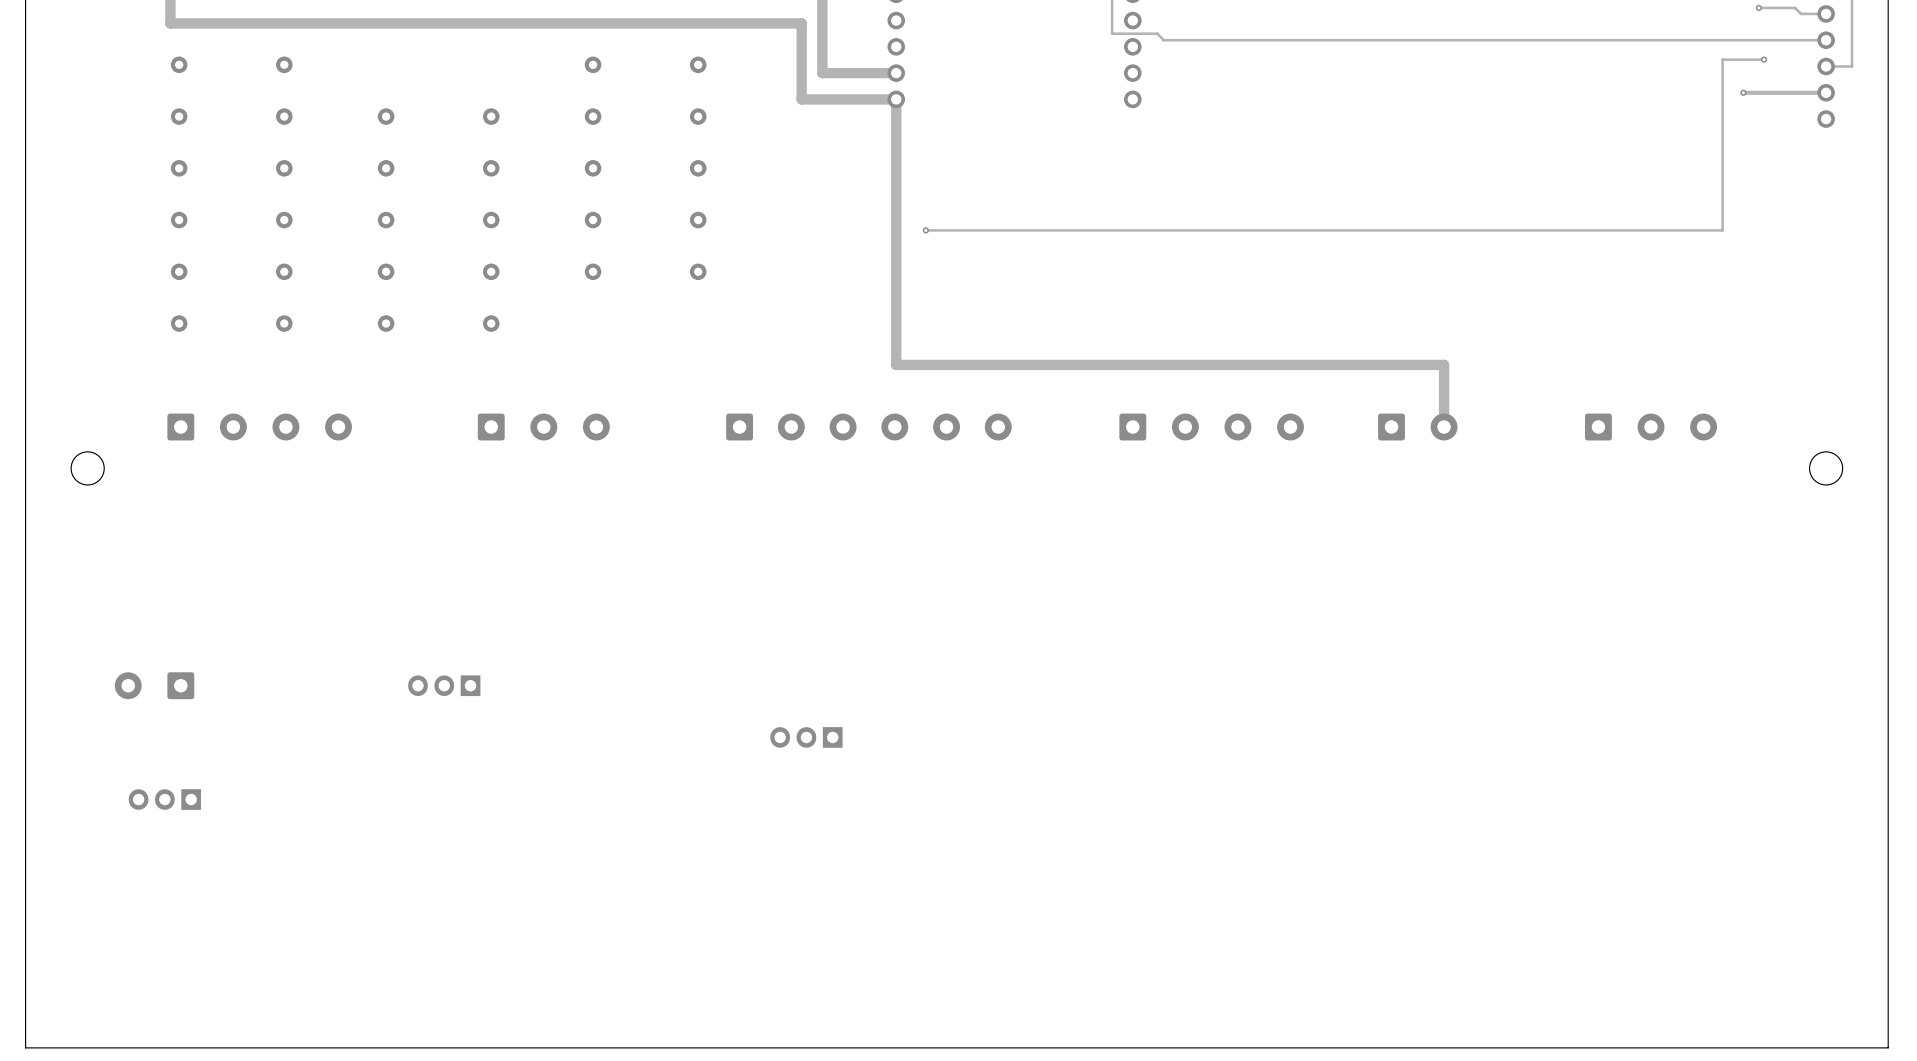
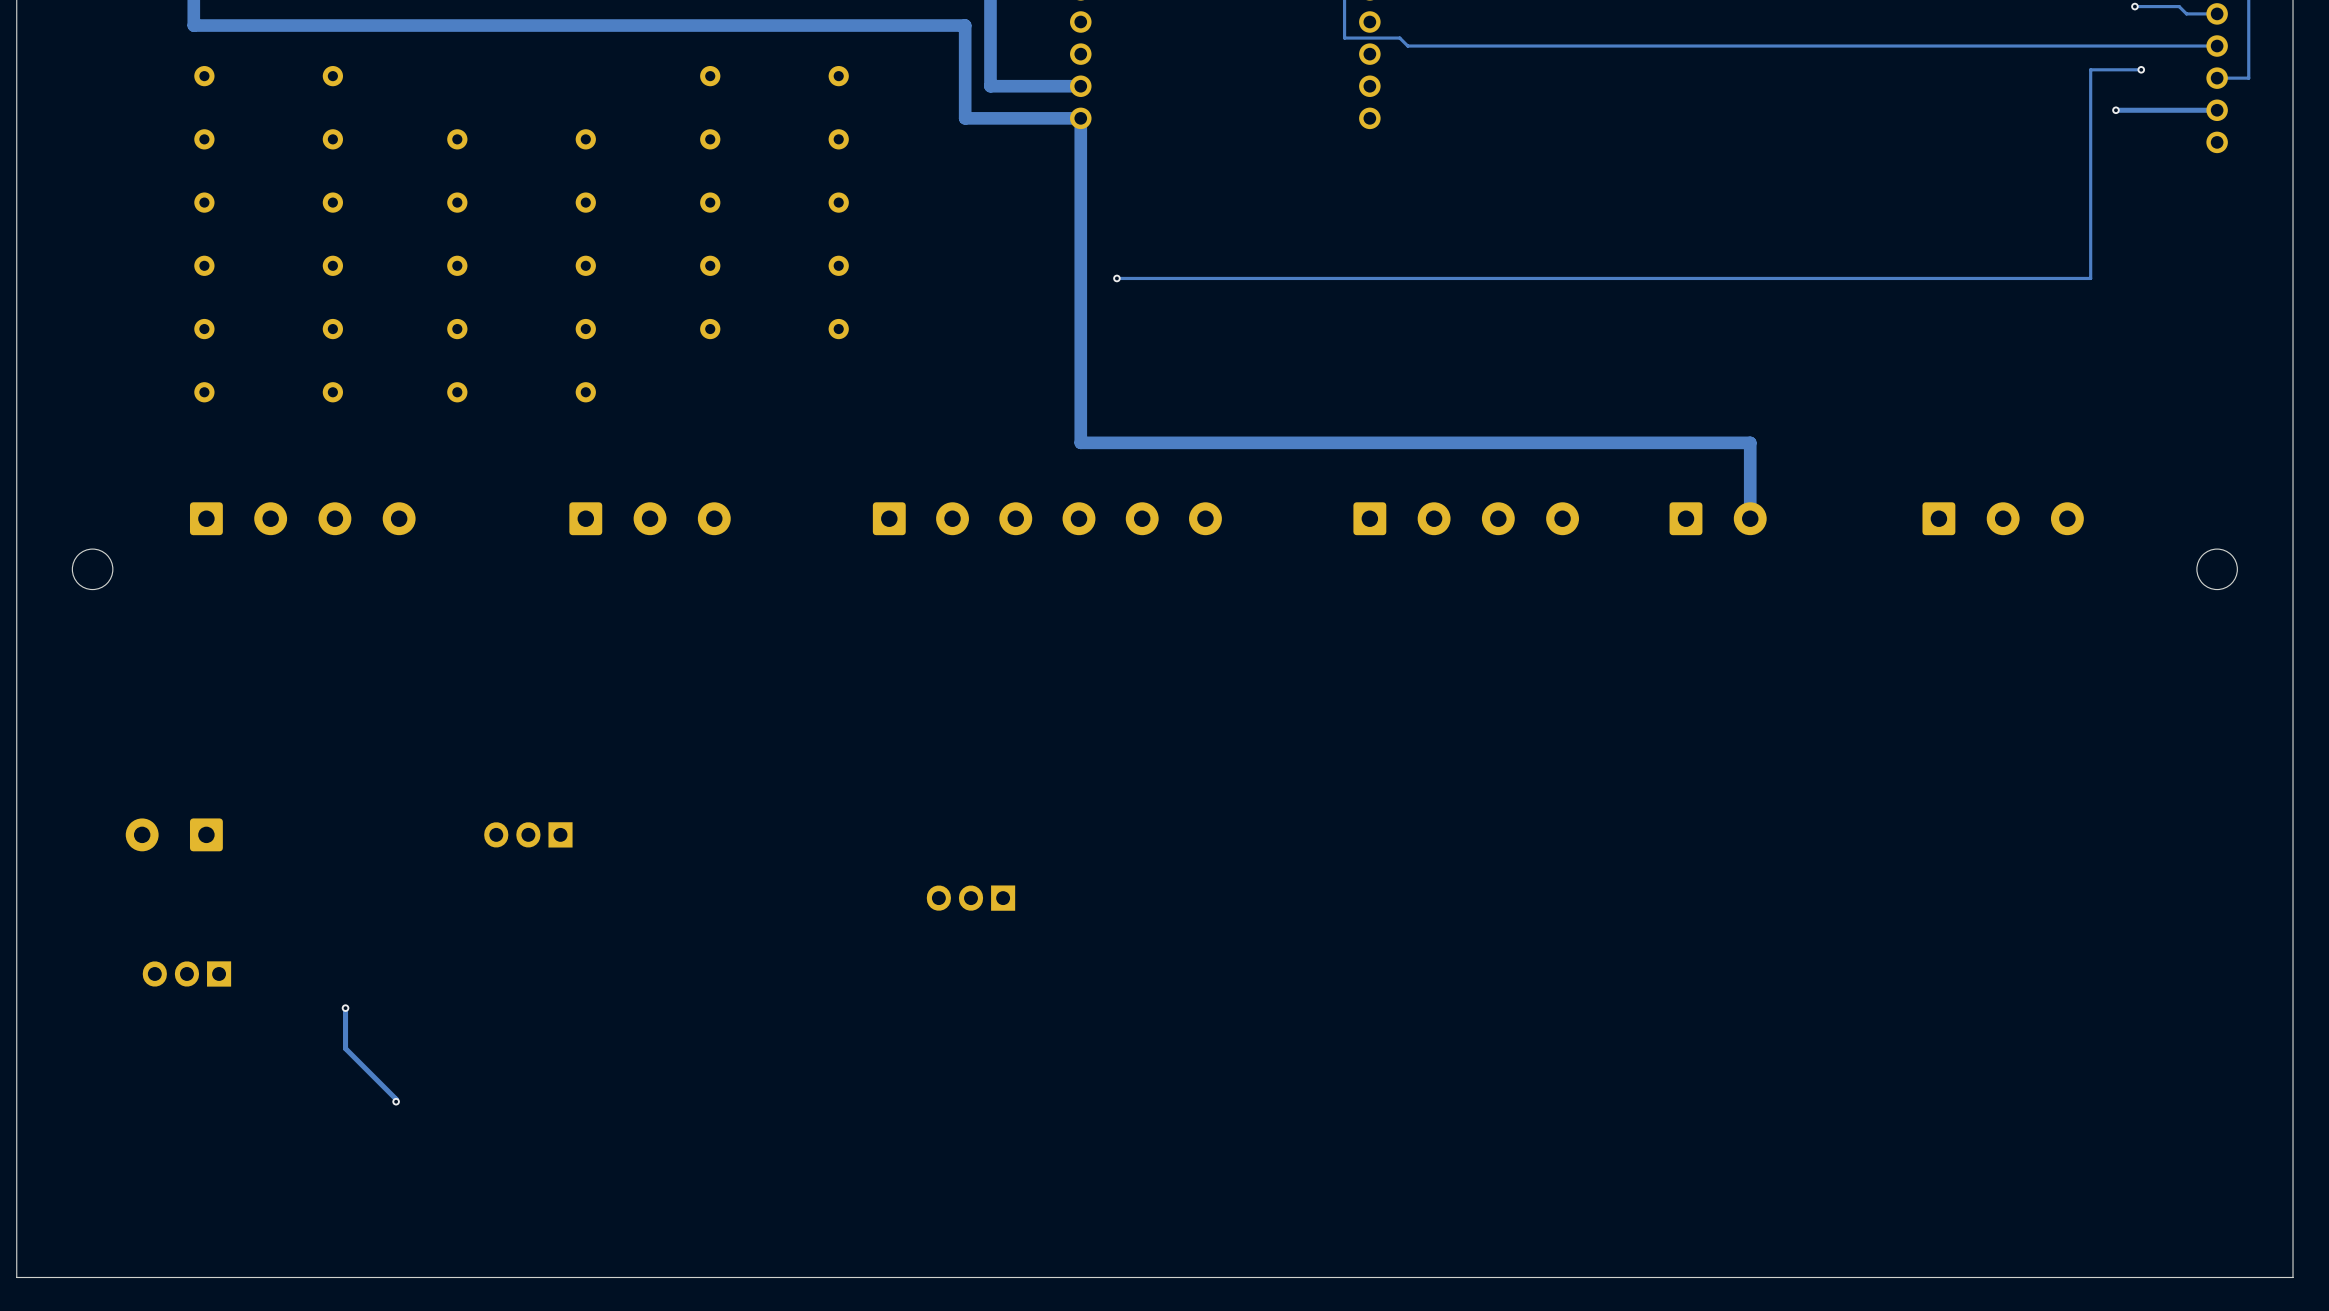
track: none -> (345, 1008) (345, 1048) (396, 1099) (396, 1101)
via: none -> (345, 1008)
via: none -> (396, 1101)

